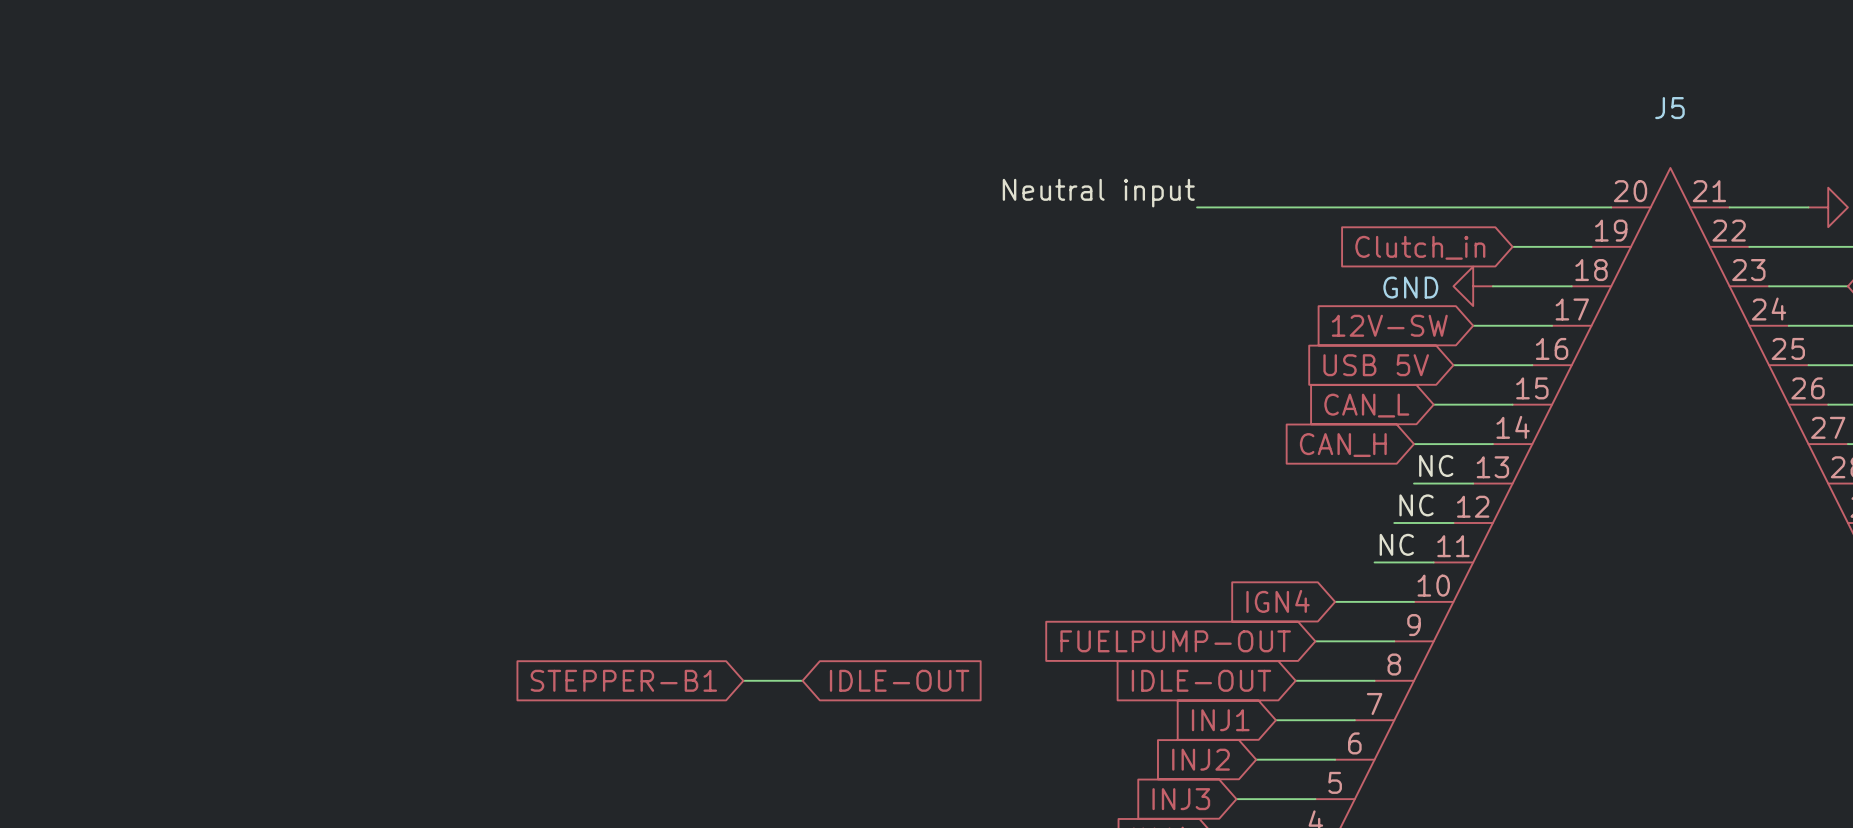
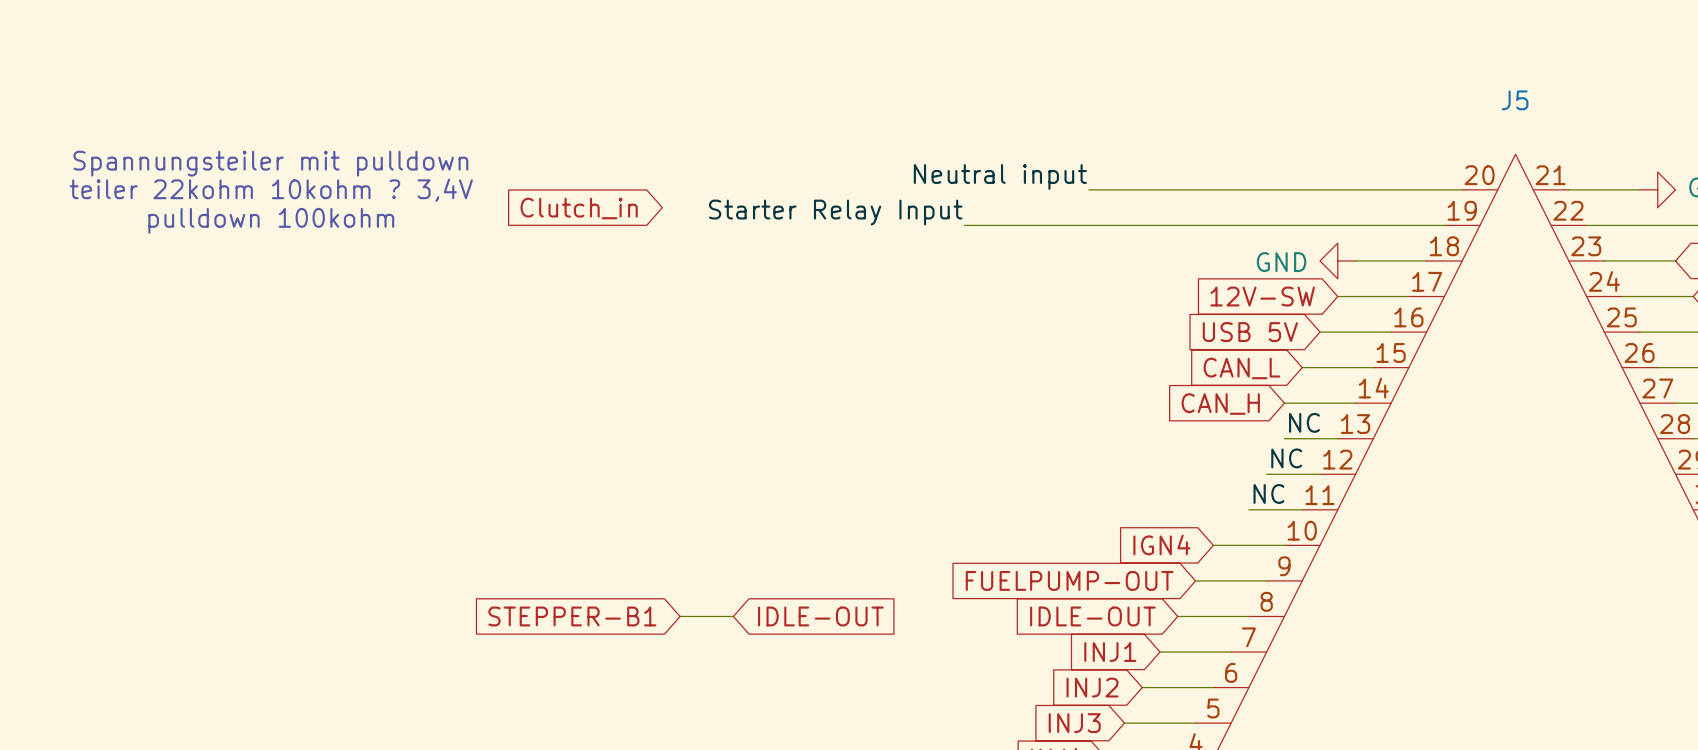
text: none -> Spannungsteiler mit pulldown (270, 163)
text: none -> teiler 22kohm 10kohm ? 3,4V (271, 190)
global label: none -> Clutch_in (579, 208)
label: none -> Starter Relay Input (835, 212)
text: none -> pulldown 100kohm (271, 220)
wire: none -> (964, 225) (1373, 225)
global label: Clutch_in (1420, 247) -> none

